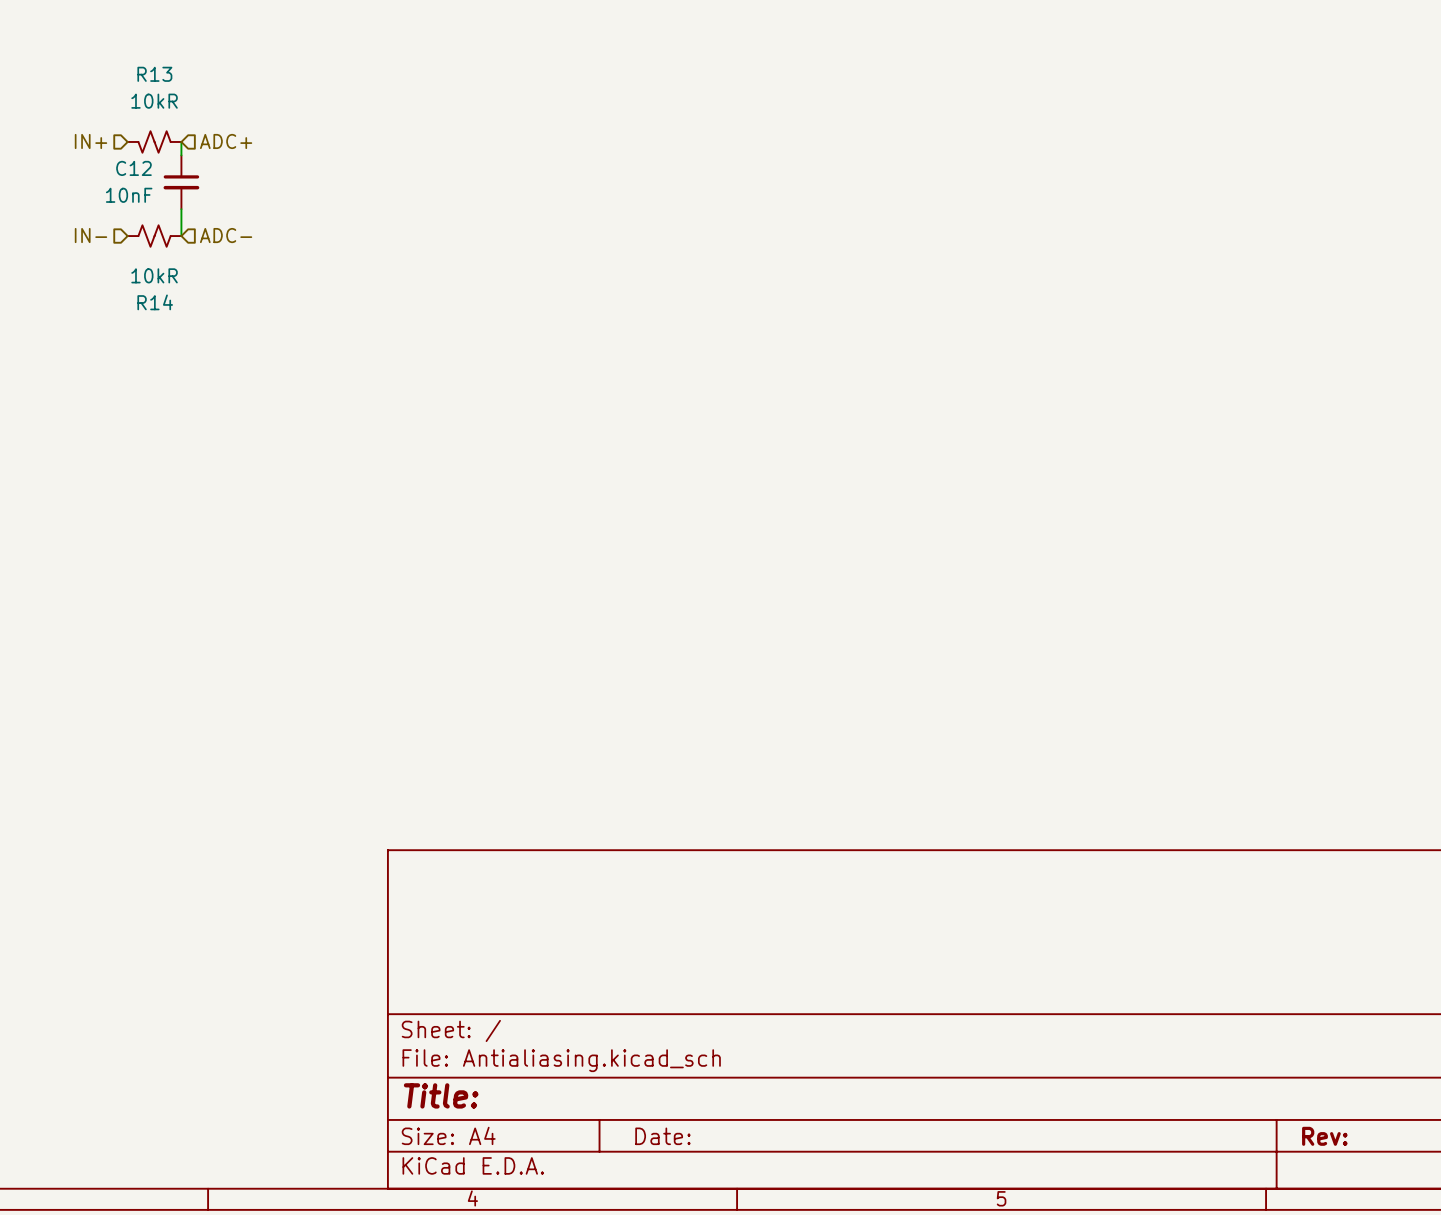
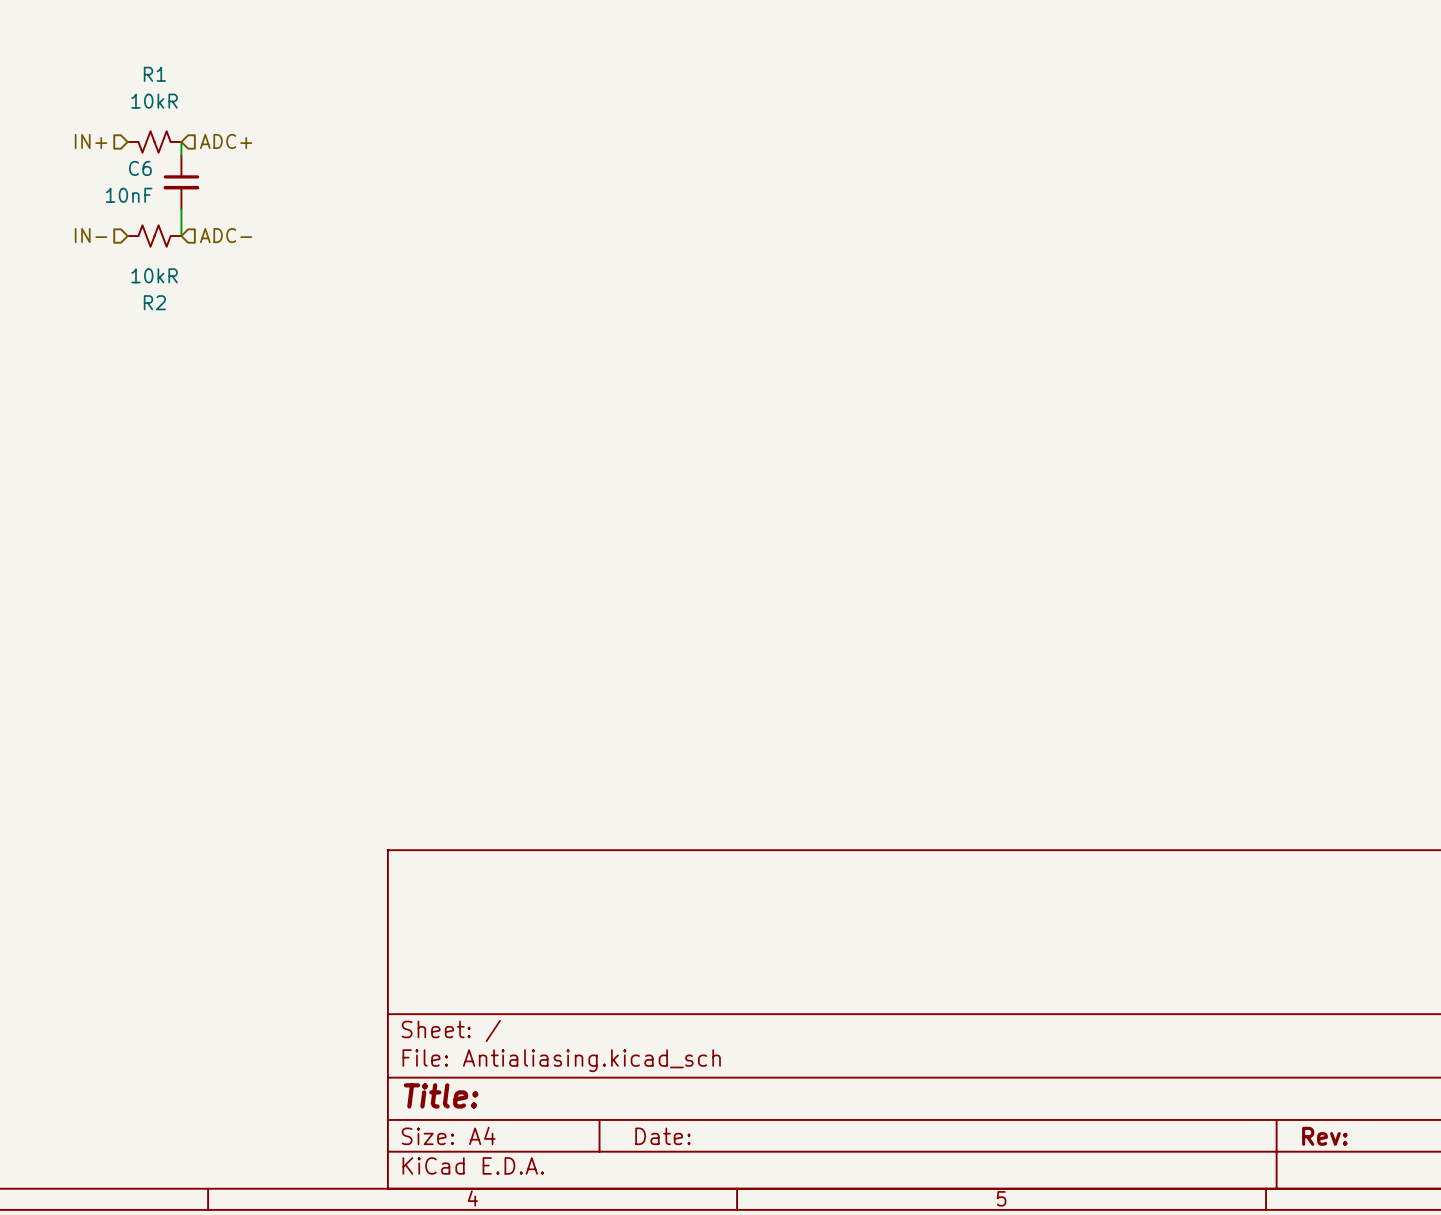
R13 name: R13 (154, 74) -> R1 (154, 74)
C12 name: C12 (133, 168) -> C6 (140, 168)
R14 name: R14 (155, 302) -> R2 (154, 302)

